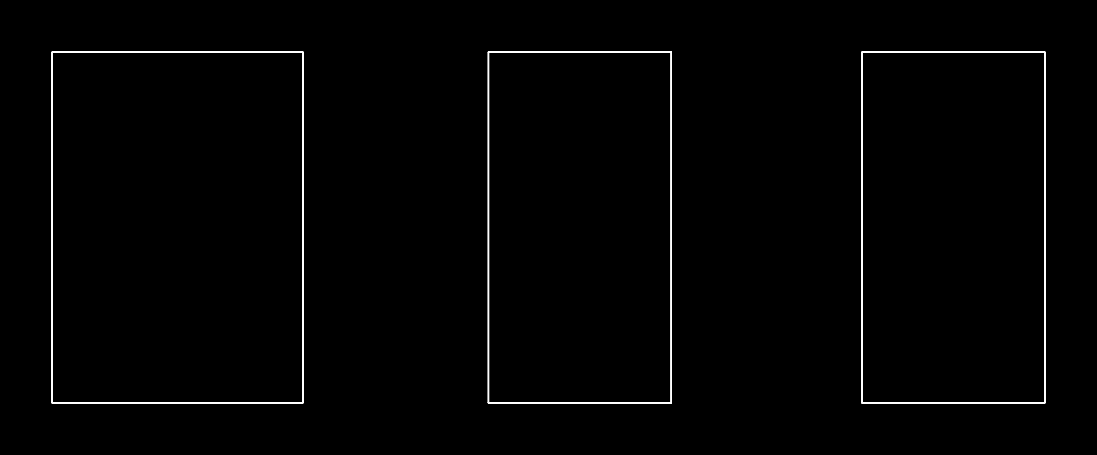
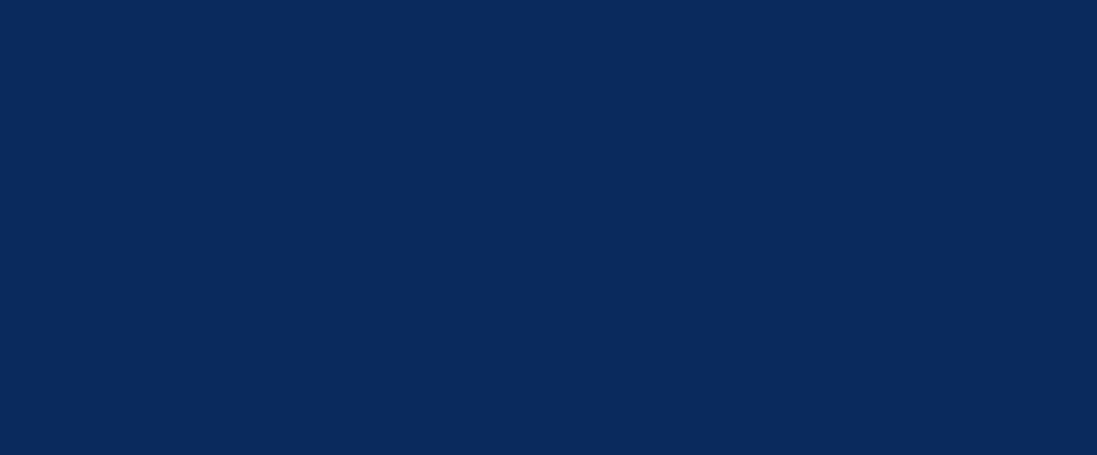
part: (177, 227) -> none
part: (579, 227) -> none
part: (953, 227) -> none

